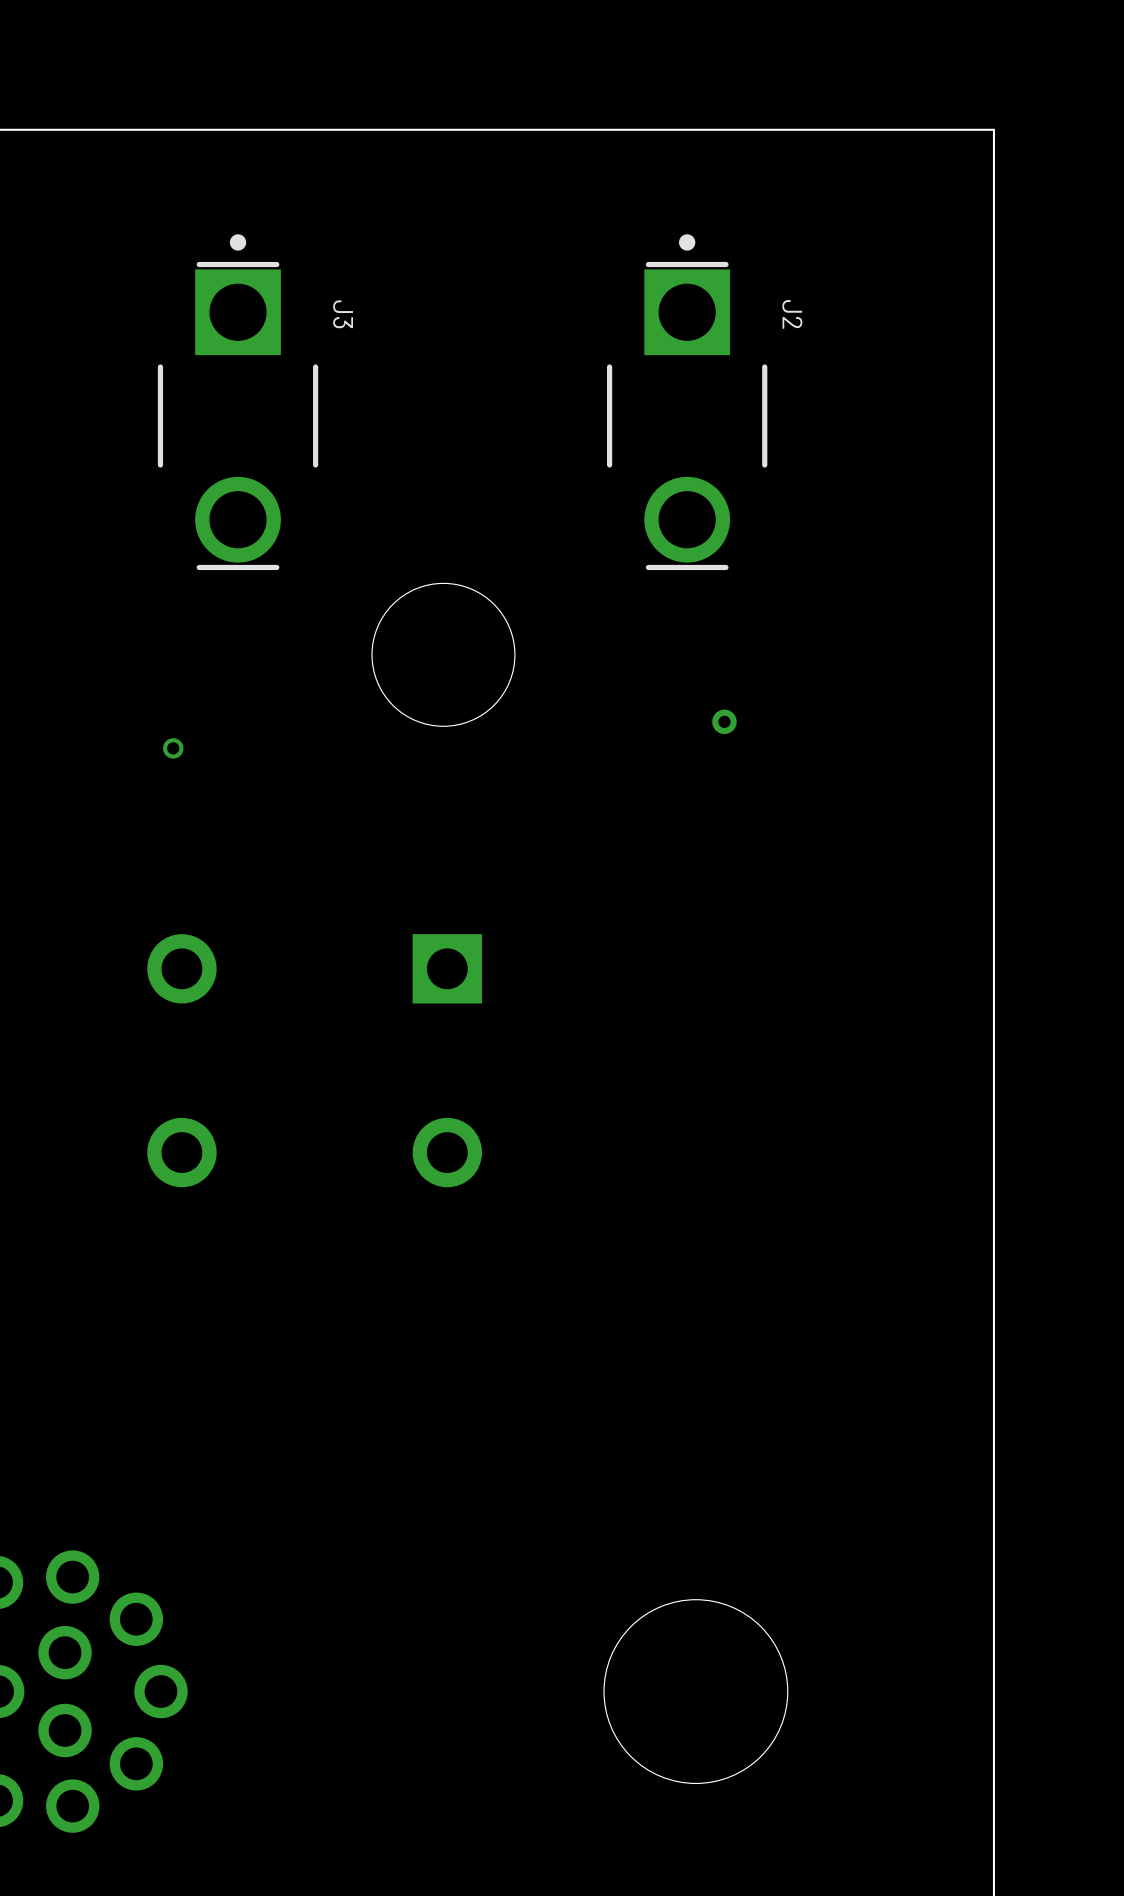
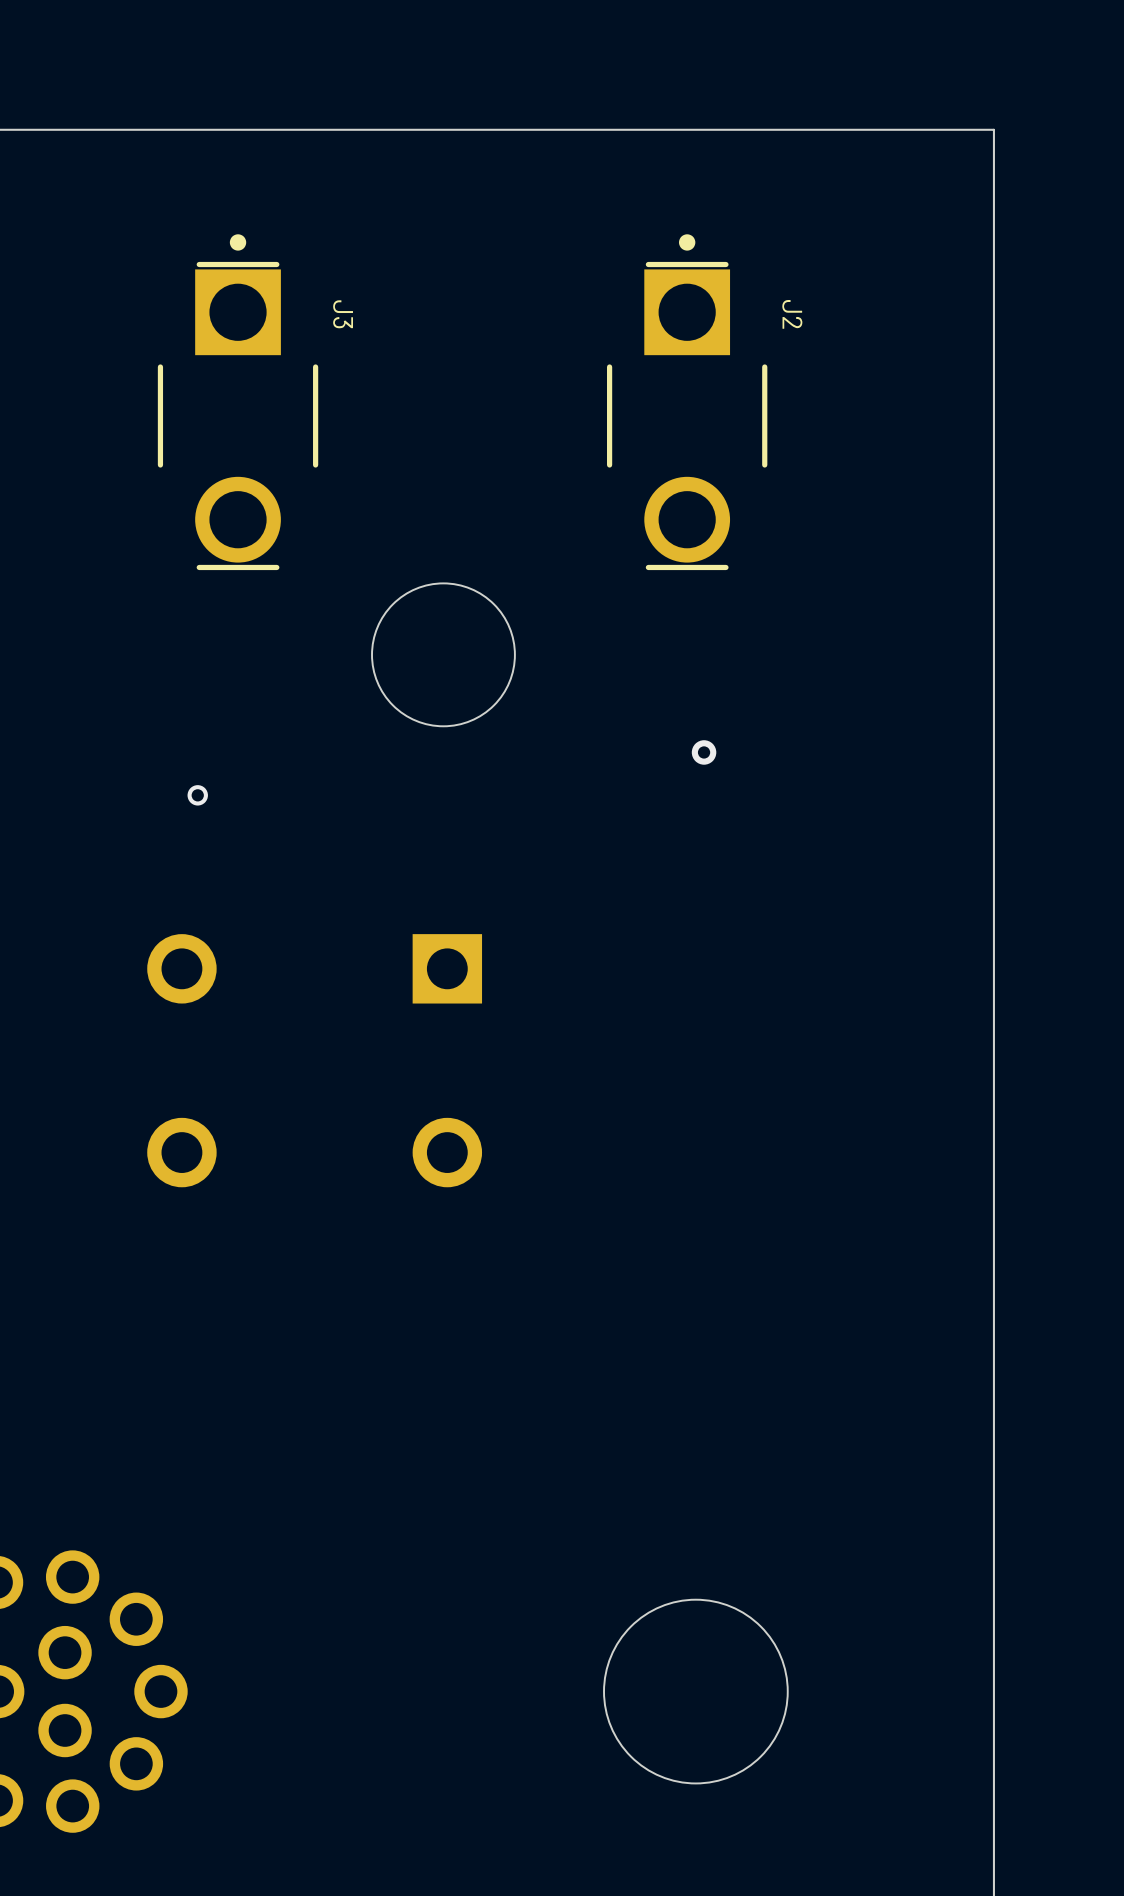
via position: (724, 721) -> (704, 752)
via position: (173, 748) -> (197, 795)

